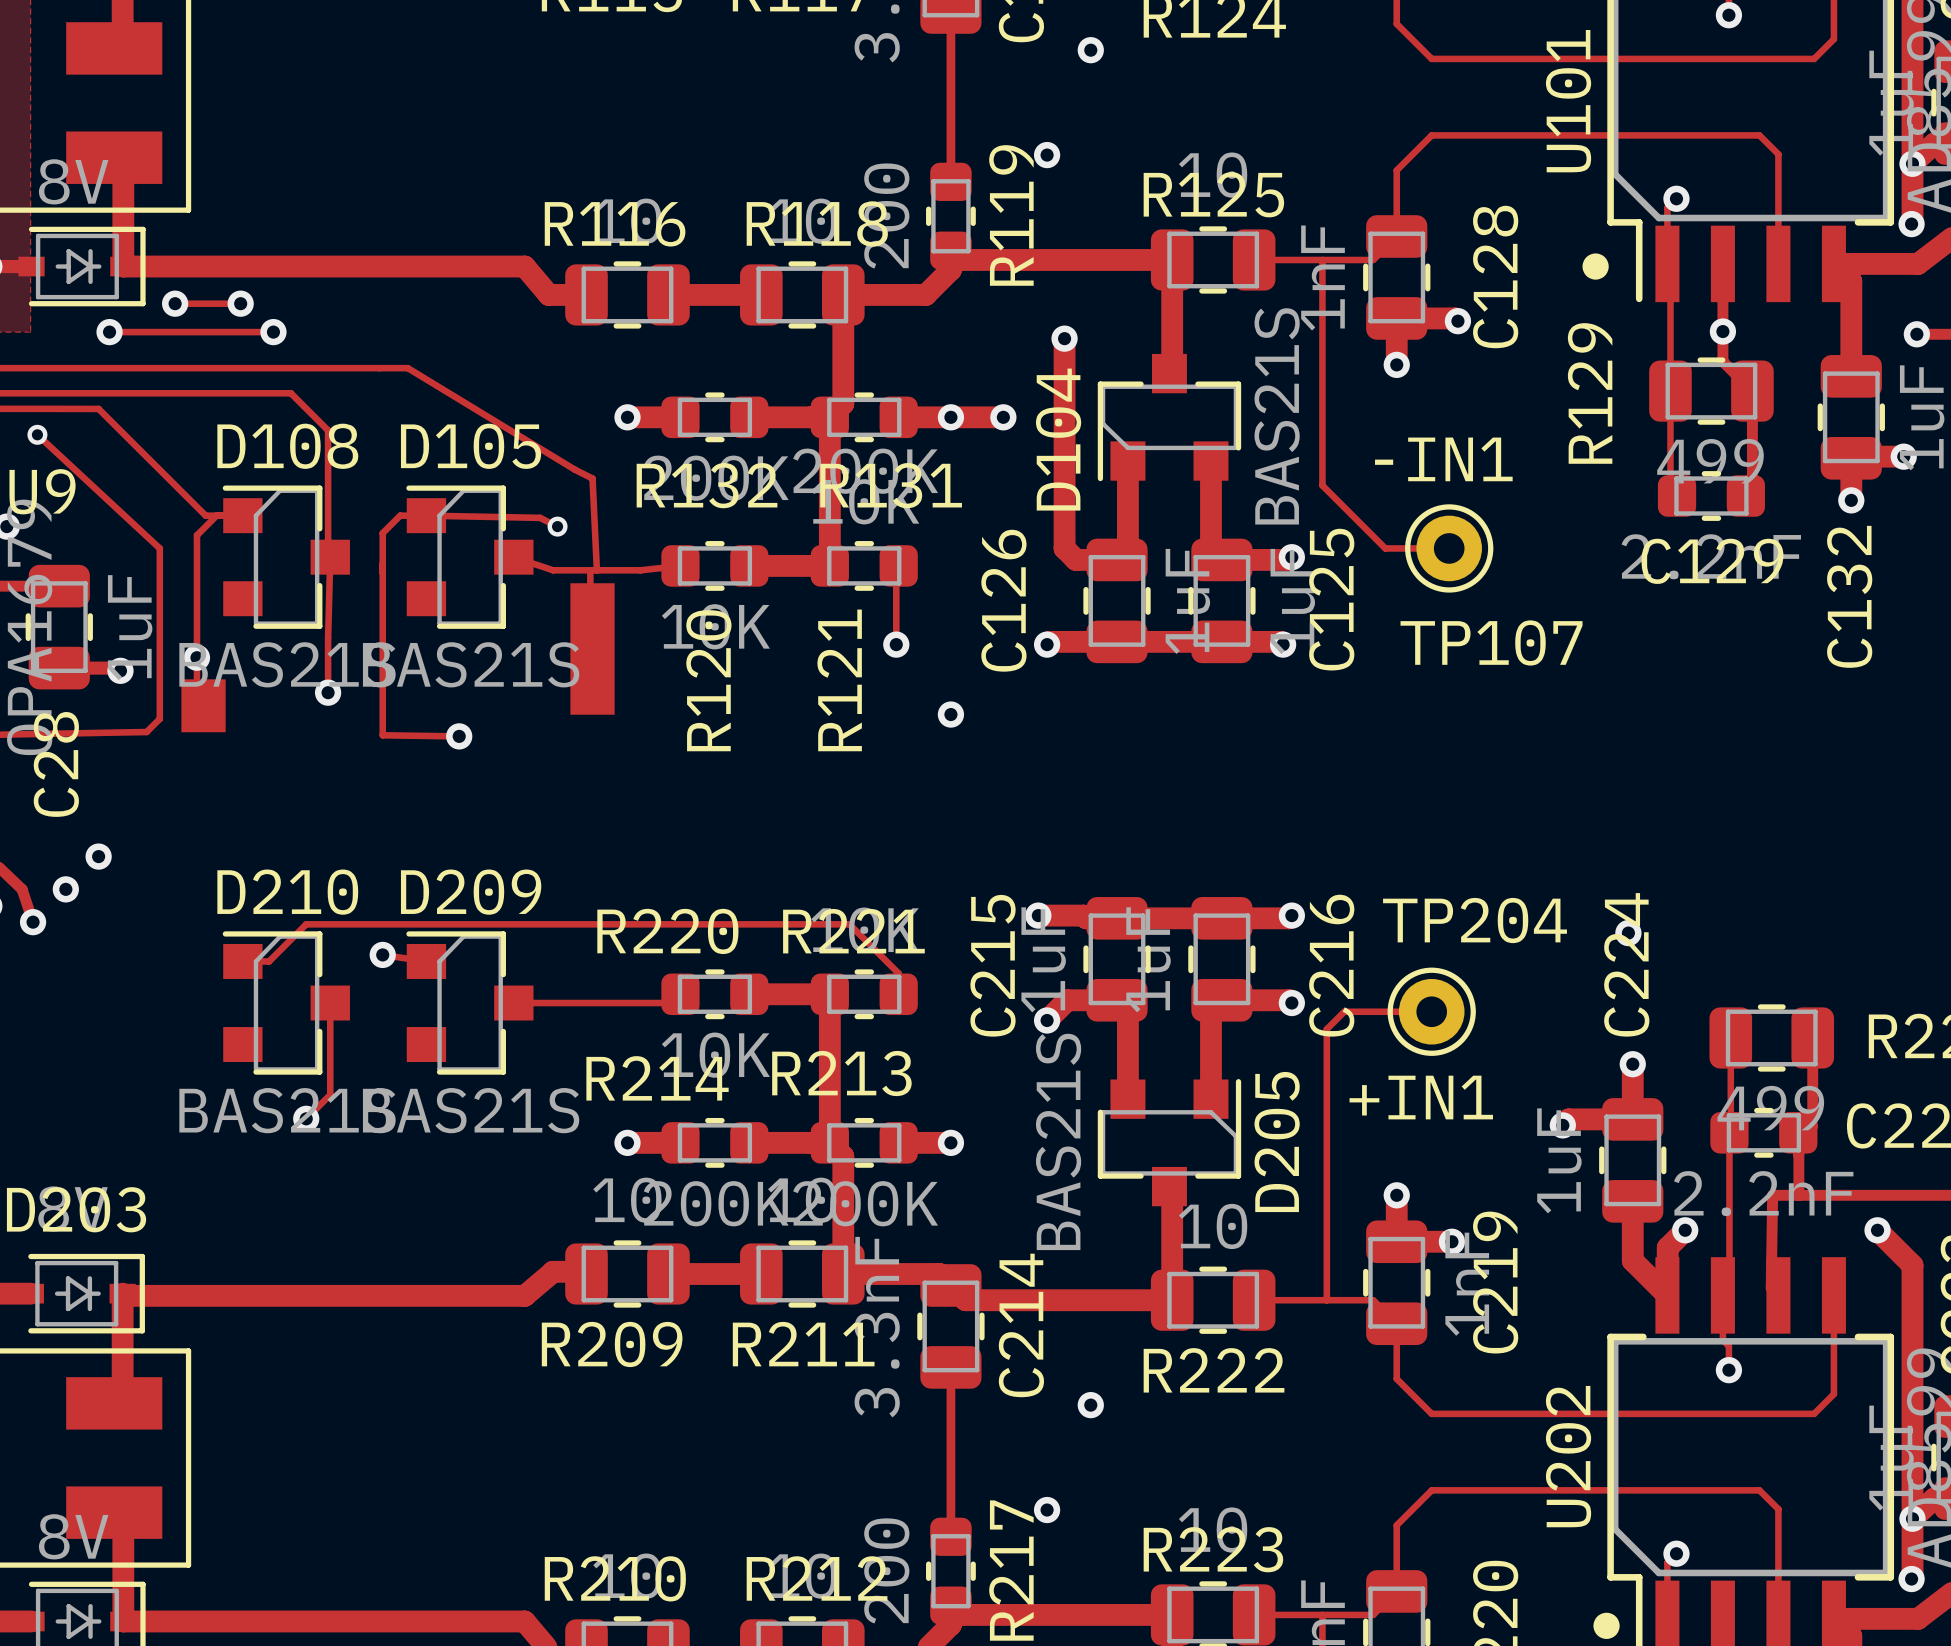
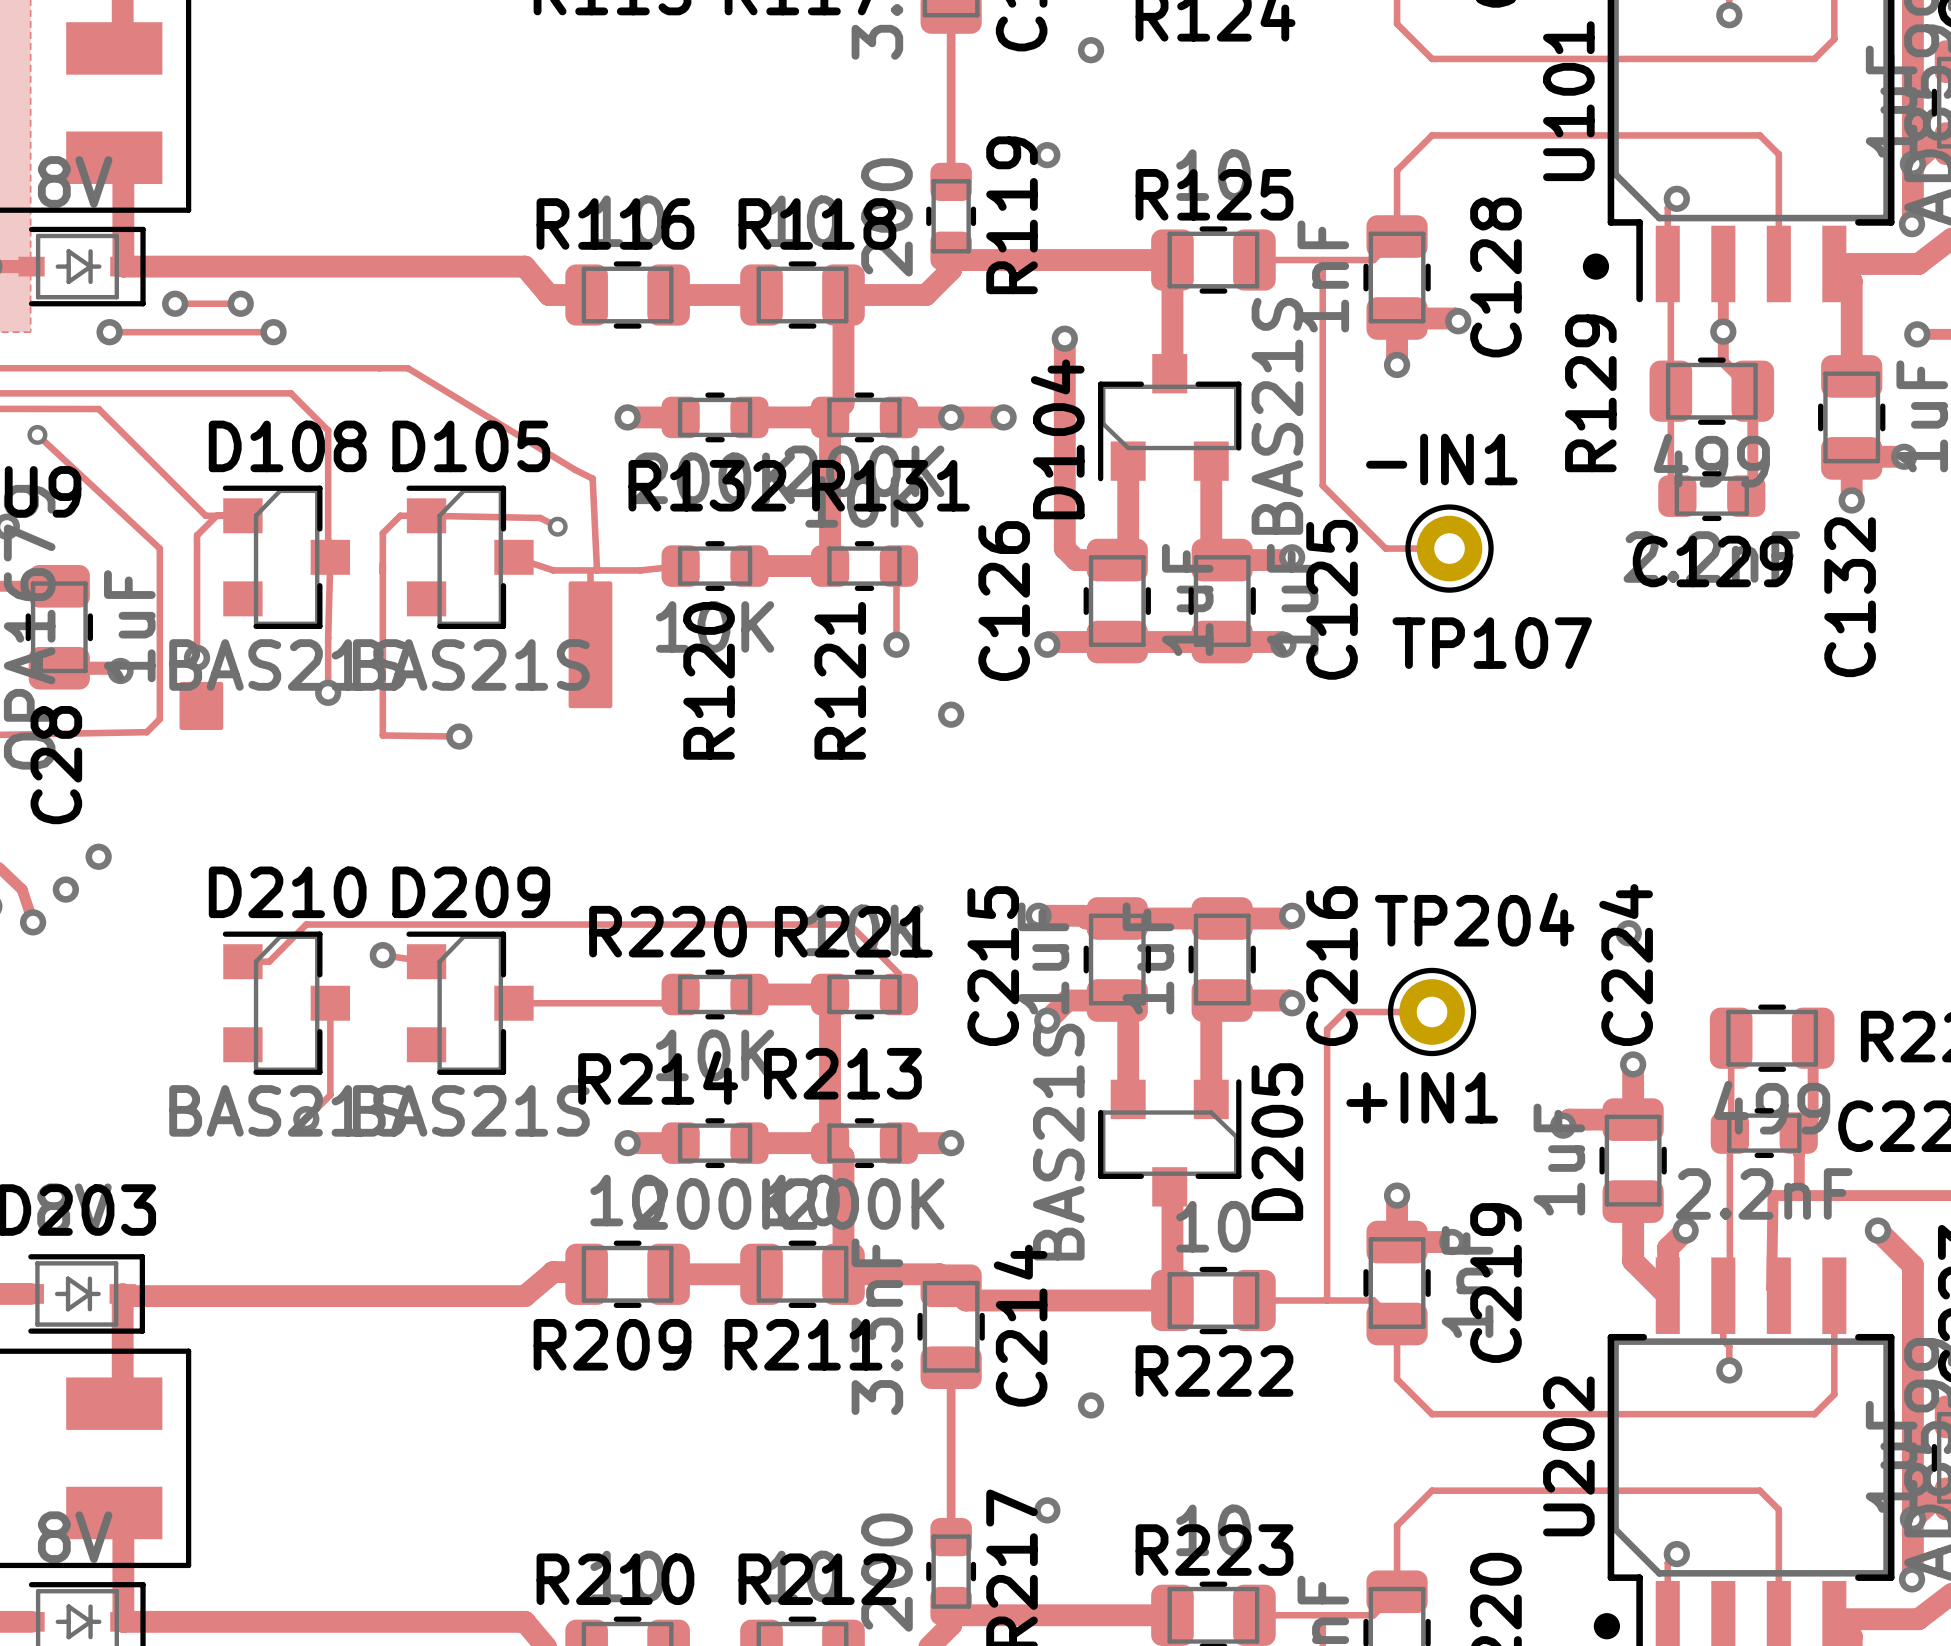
drawing shape: [570, 583, 615, 715] -> [568, 581, 613, 709]
drawing shape: [181, 679, 226, 733] -> [179, 681, 224, 731]

